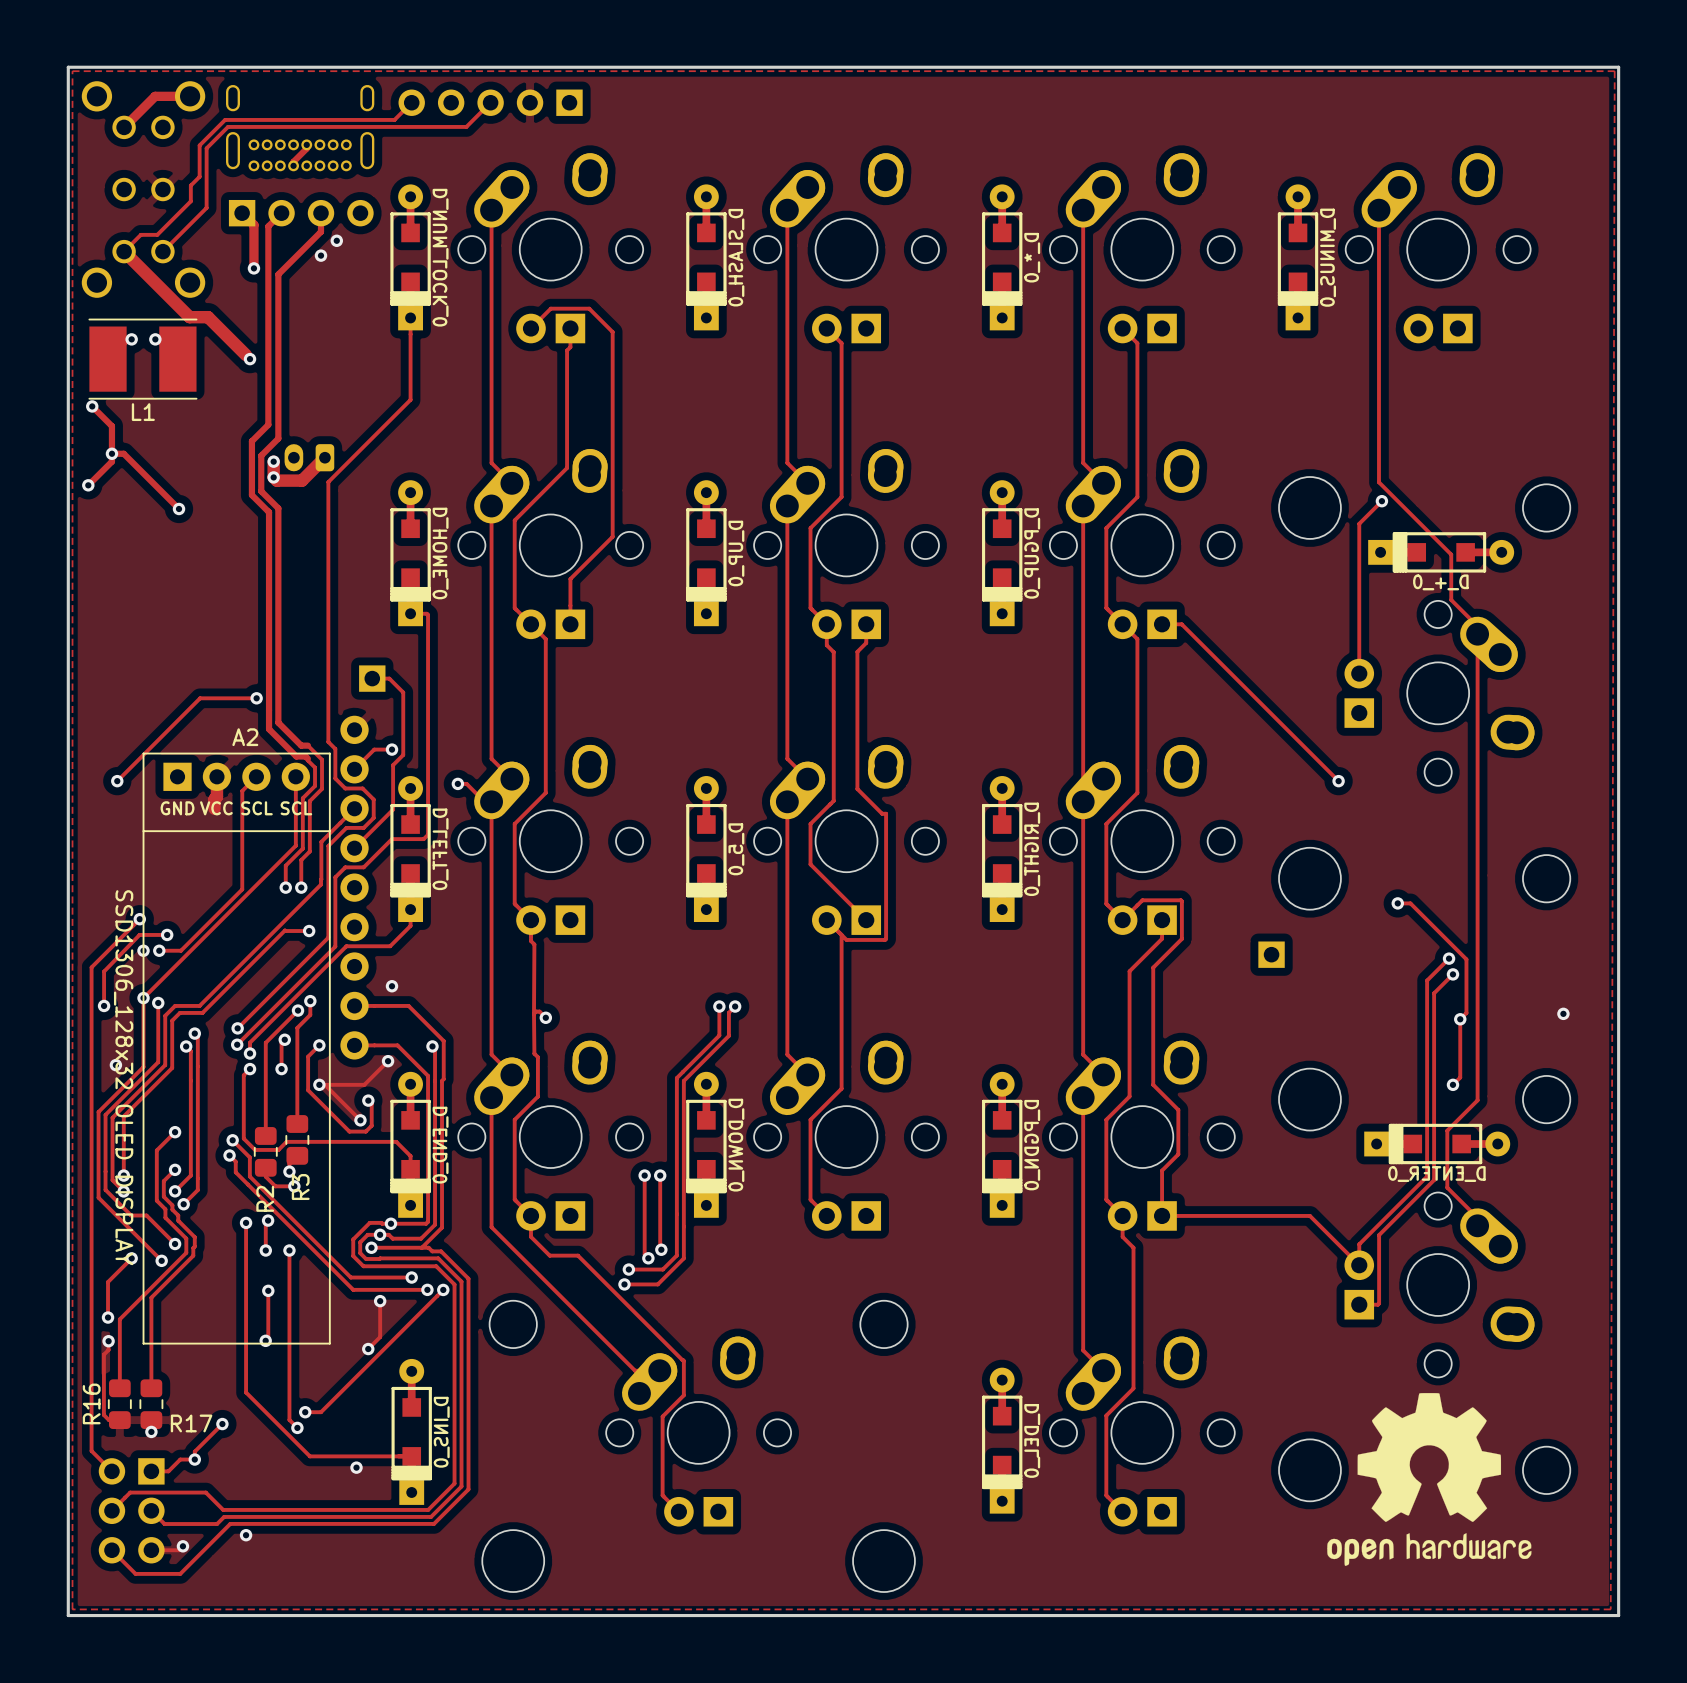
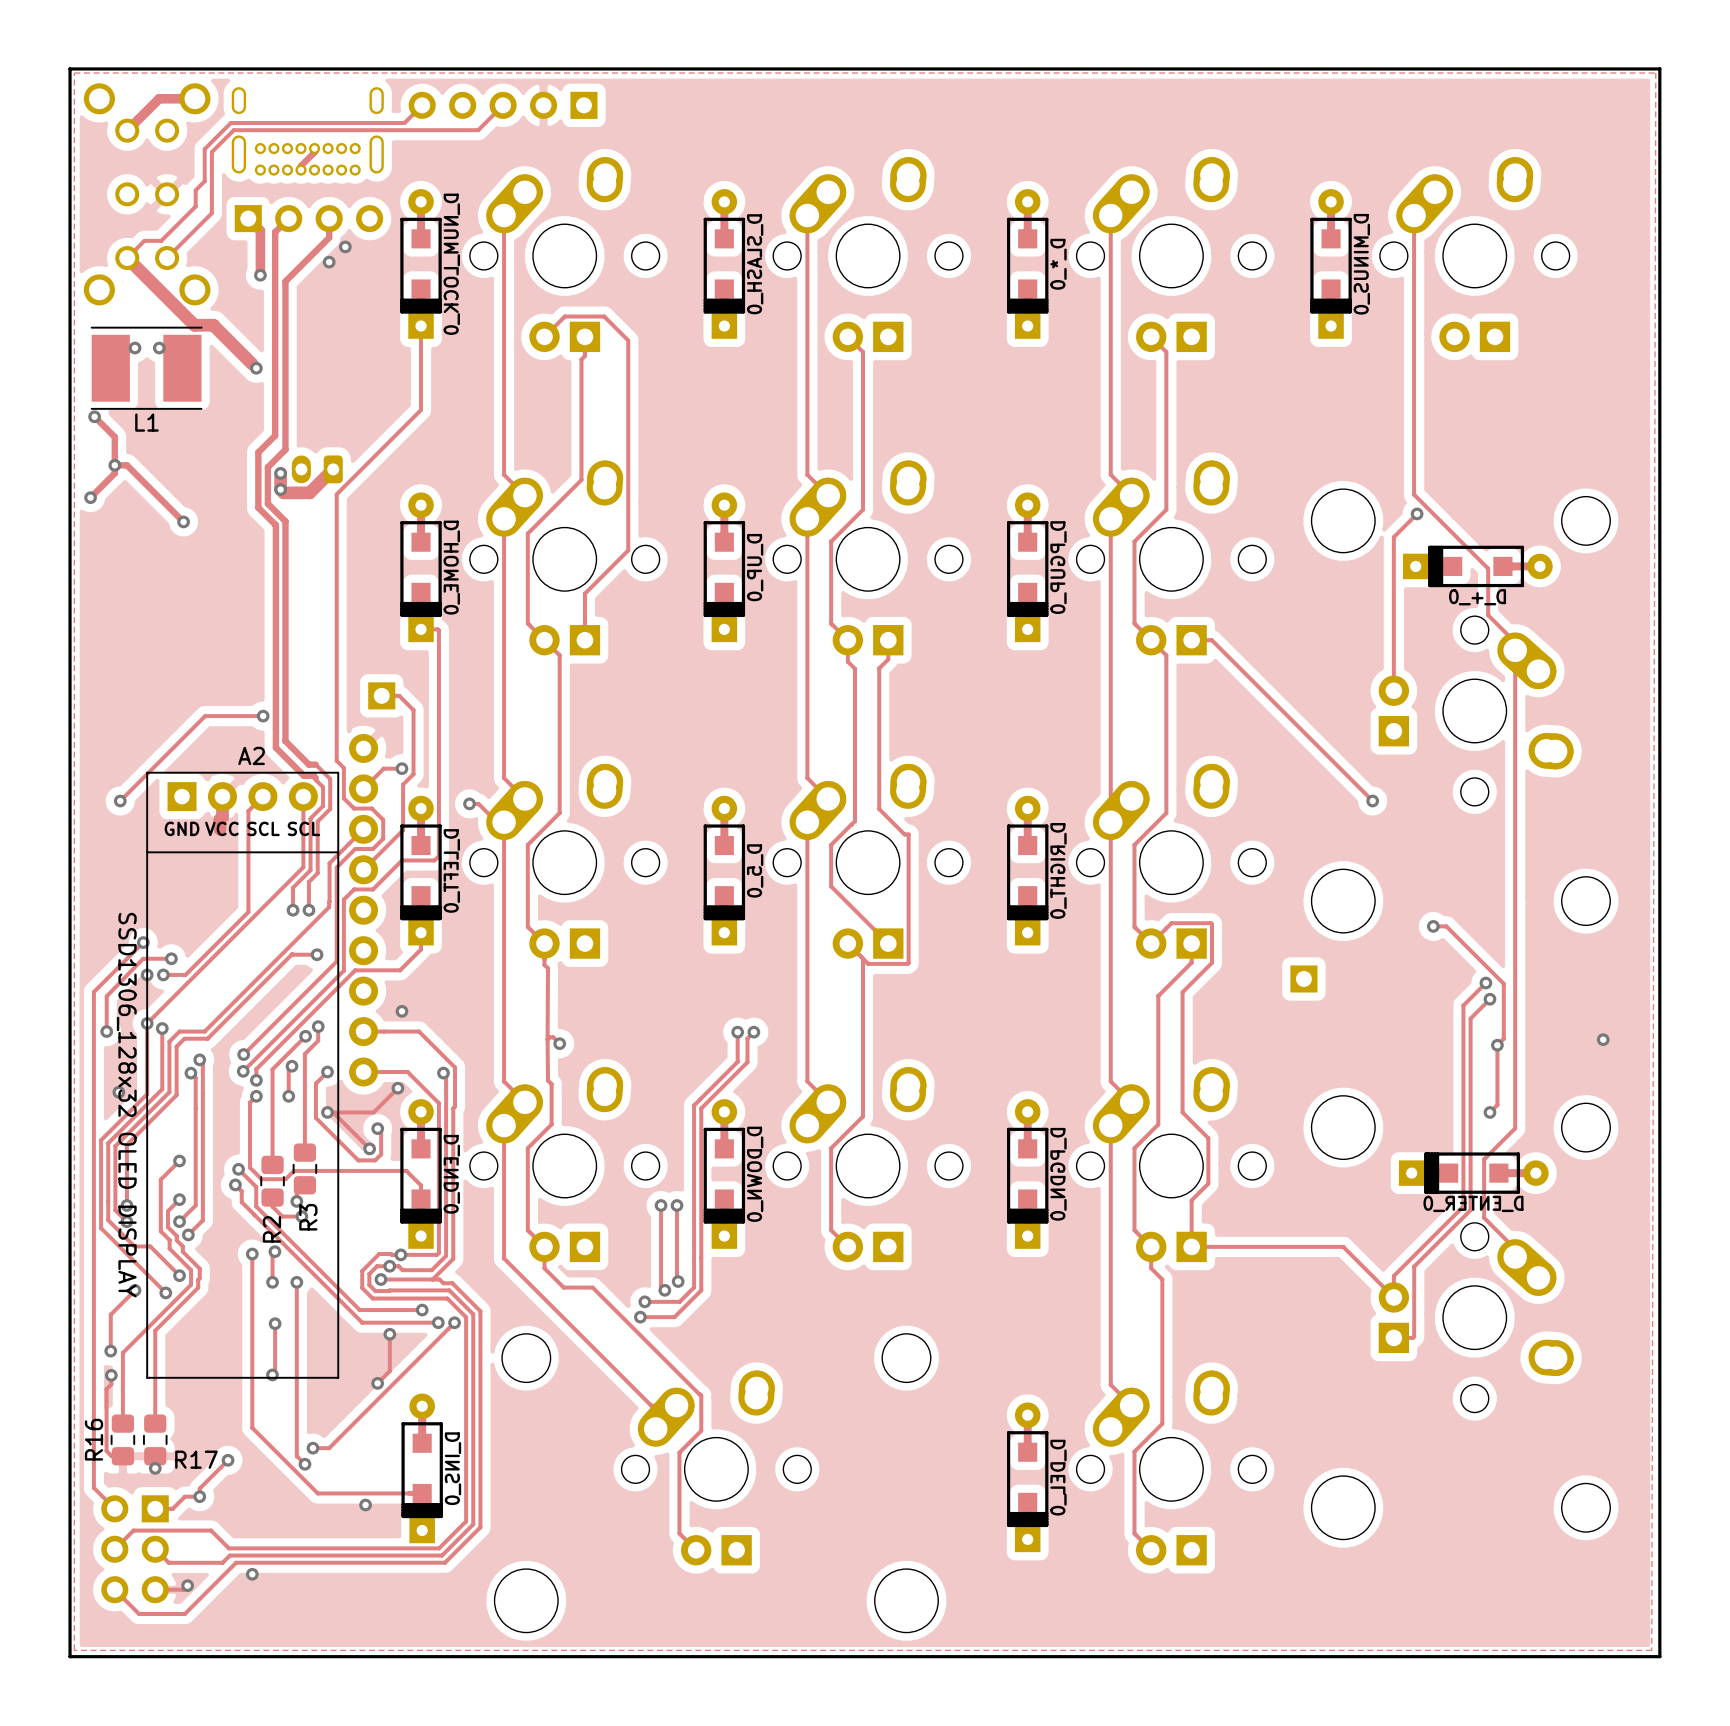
drawing: [1327, 1393, 1532, 1566] -> none

